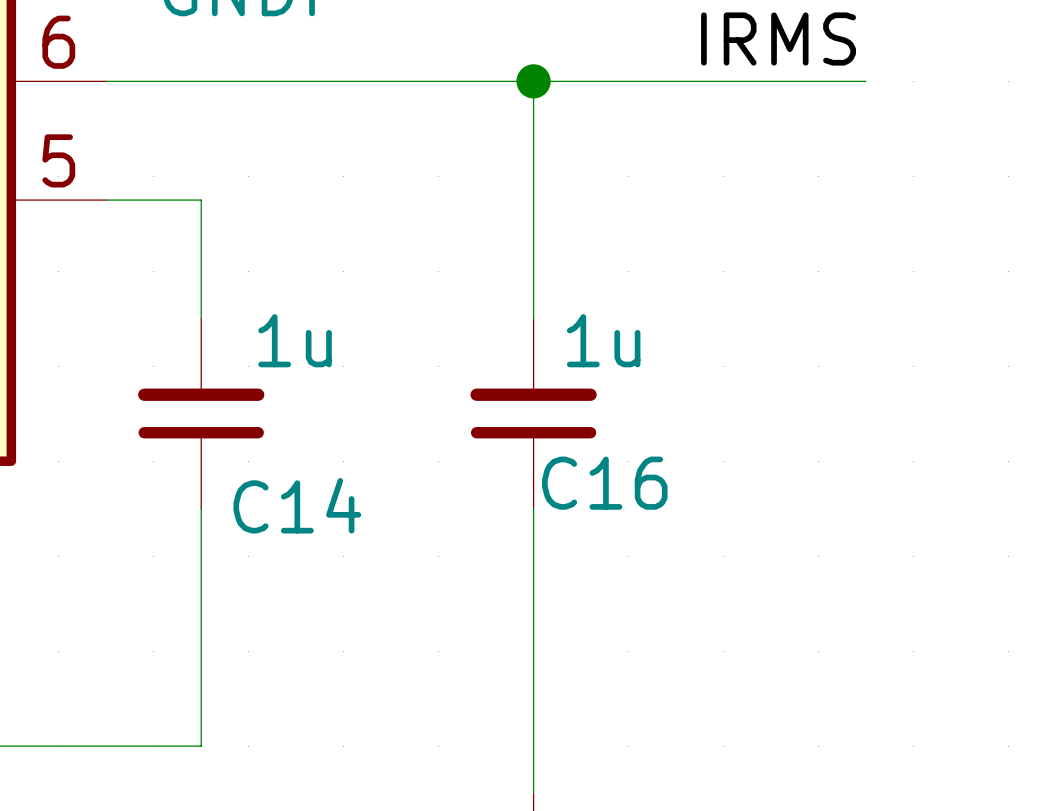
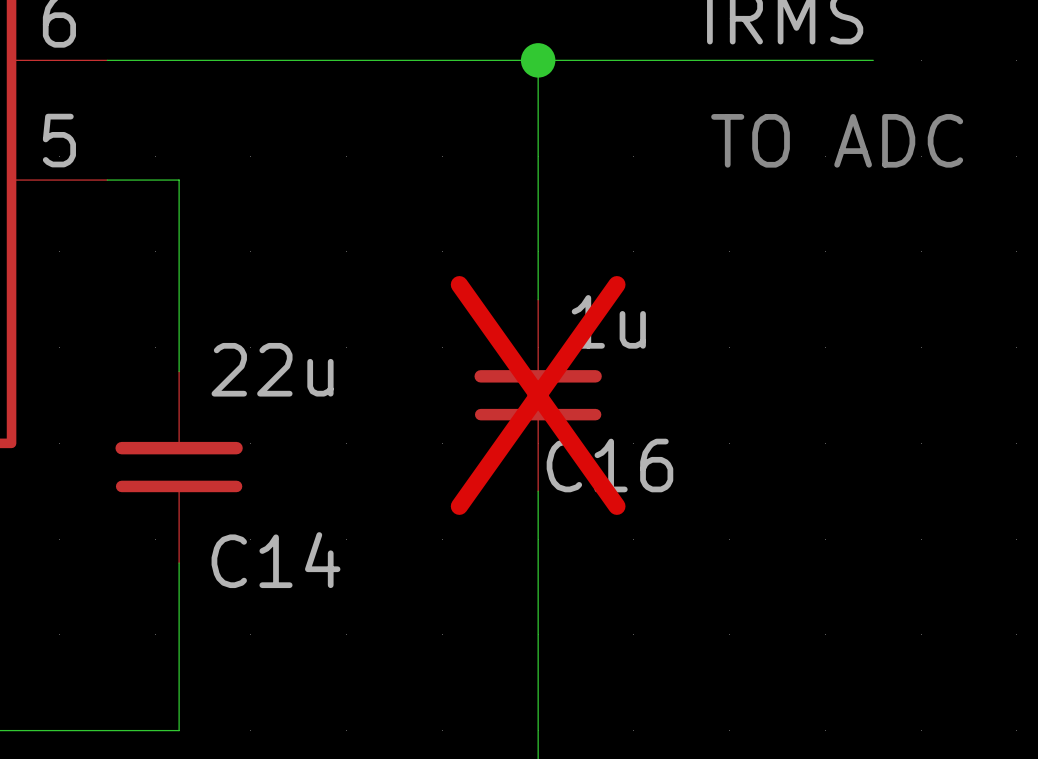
text: none -> TO ADC (837, 140)
wire: (177, 200) (201, 200) (201, 318) -> (179, 180) (179, 371)
C14 value: 1u (295, 340) -> 22u (272, 369)
C14 position: (201, 413) -> (179, 467)
C16 do-not-place cross: none -> (538, 395)
wire: (201, 508) (201, 746) (177, 746) -> (179, 563) (179, 730)

